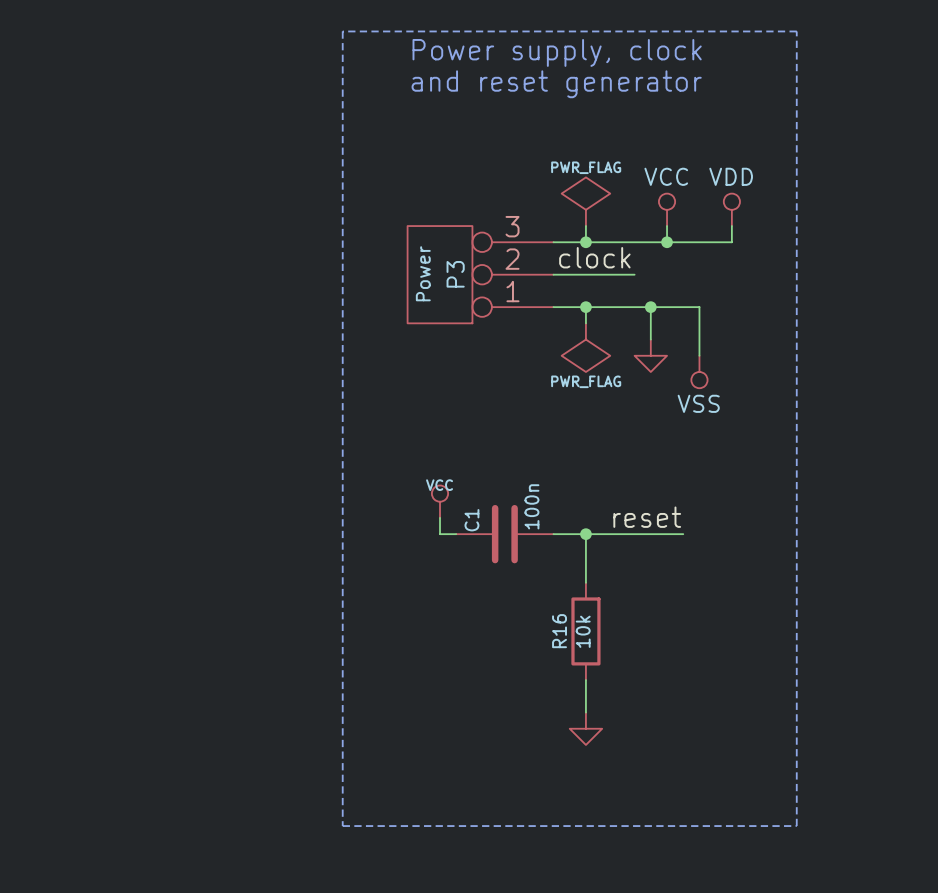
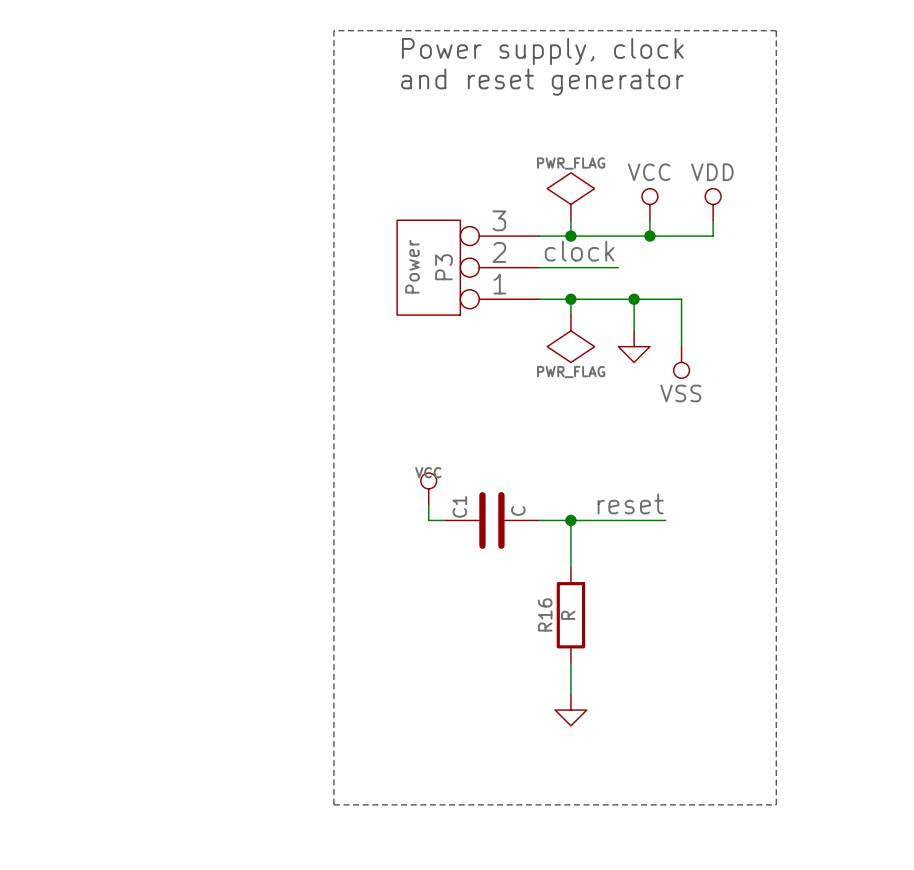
C1 value: 100n (531, 506) -> C (518, 511)
R16 value: 10k (583, 631) -> R (568, 615)

